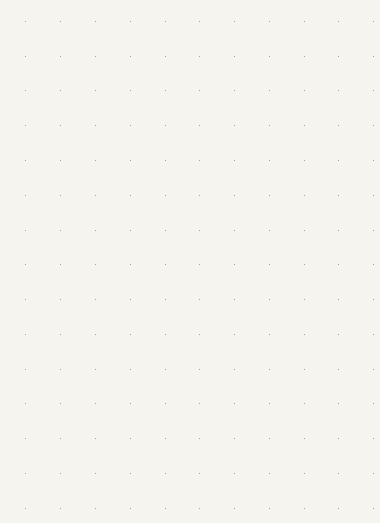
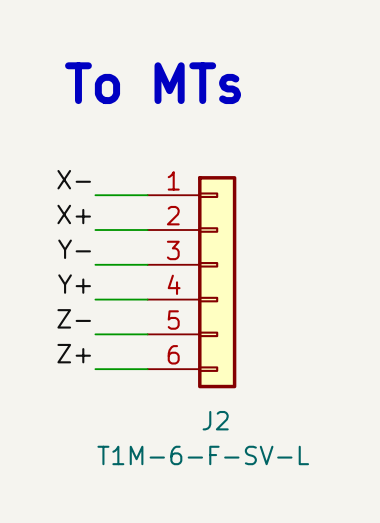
text: none -> To MTs (153, 83)
label: none -> X- (74, 179)
wire: none -> (95, 195) (147, 195)
label: none -> X+ (74, 214)
wire: none -> (95, 230) (147, 230)
label: none -> Y- (74, 249)
wire: none -> (95, 264) (147, 264)
J2: none -> T1M-6-F-SV-L (191, 282)
label: none -> Y+ (74, 284)
wire: none -> (95, 299) (147, 299)
label: none -> Z- (74, 318)
wire: none -> (95, 334) (147, 334)
label: none -> Z+ (74, 353)
wire: none -> (95, 369) (147, 369)

